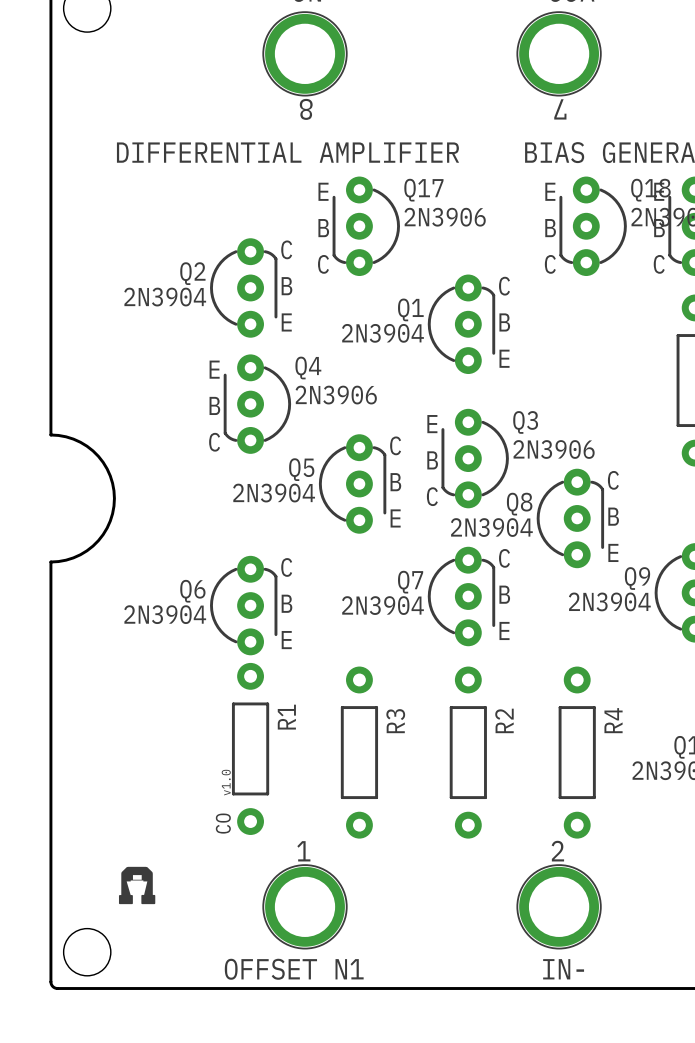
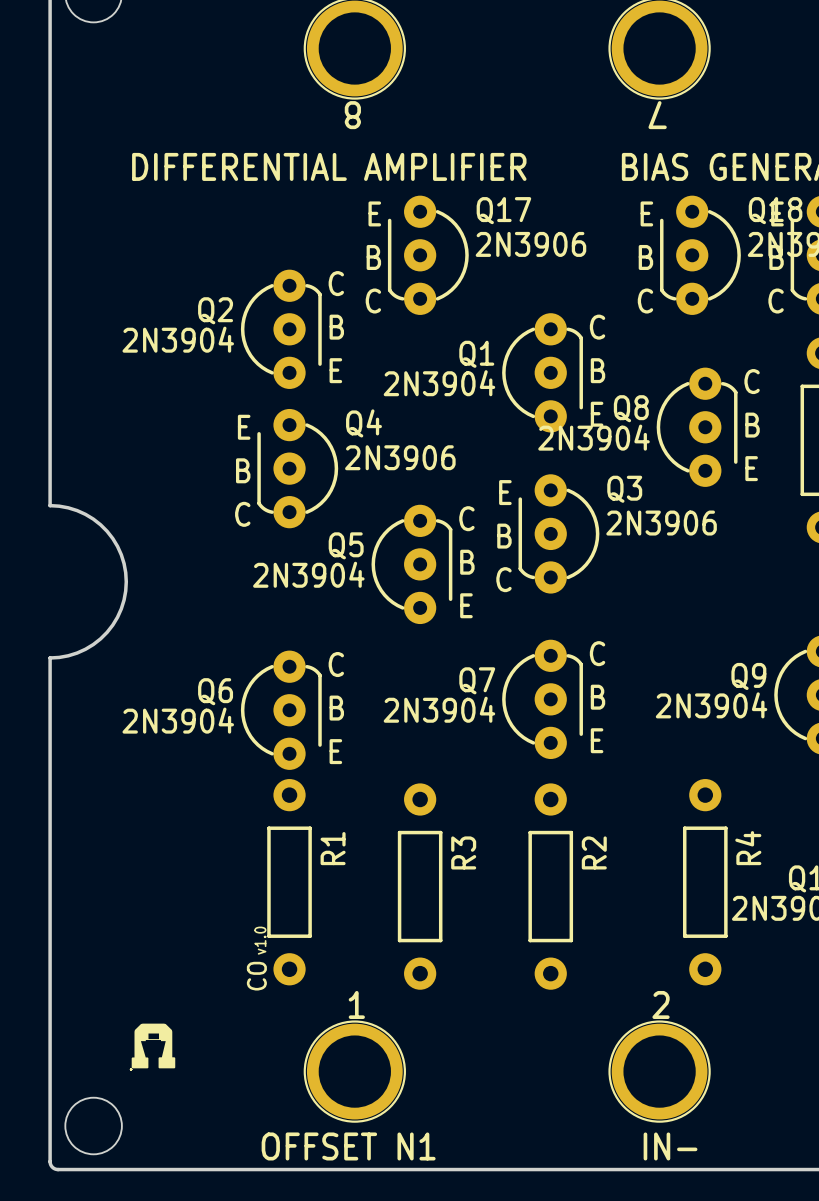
Q8 position: (570, 518) -> (697, 427)
R4 position: (577, 752) -> (705, 882)
text position: v1.0 (226, 782) -> v1.0 (260, 940)

